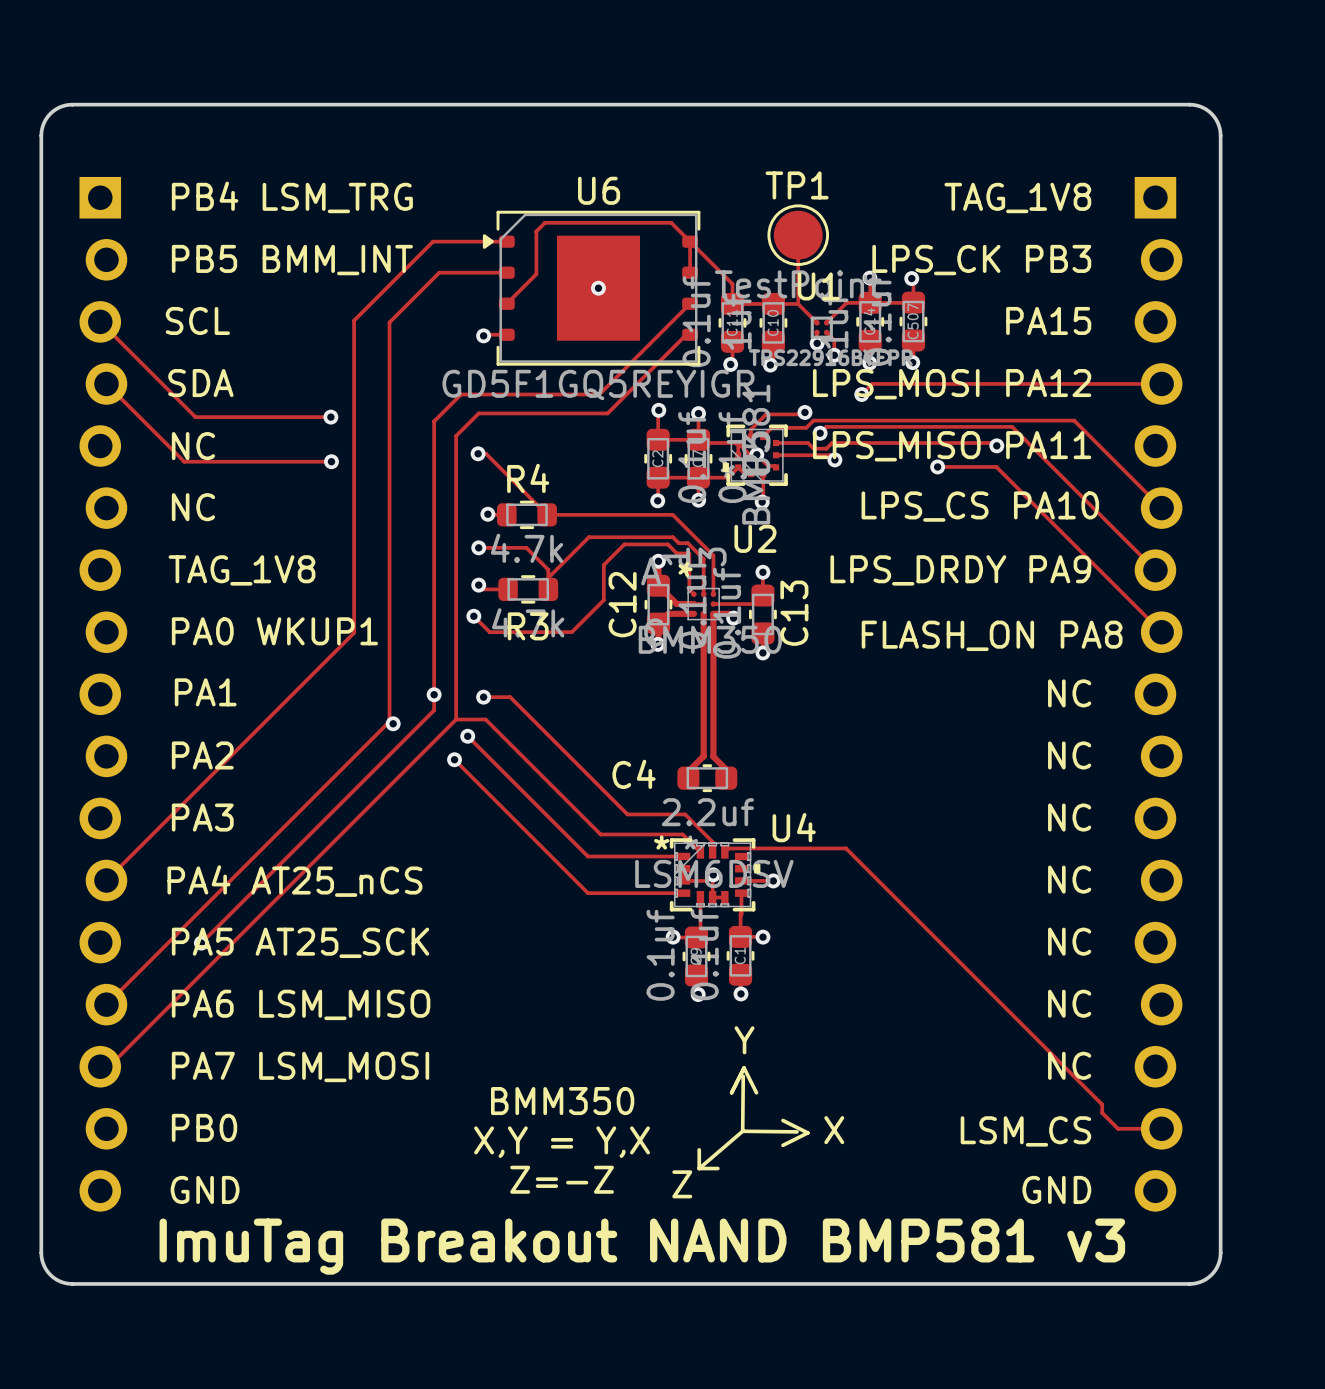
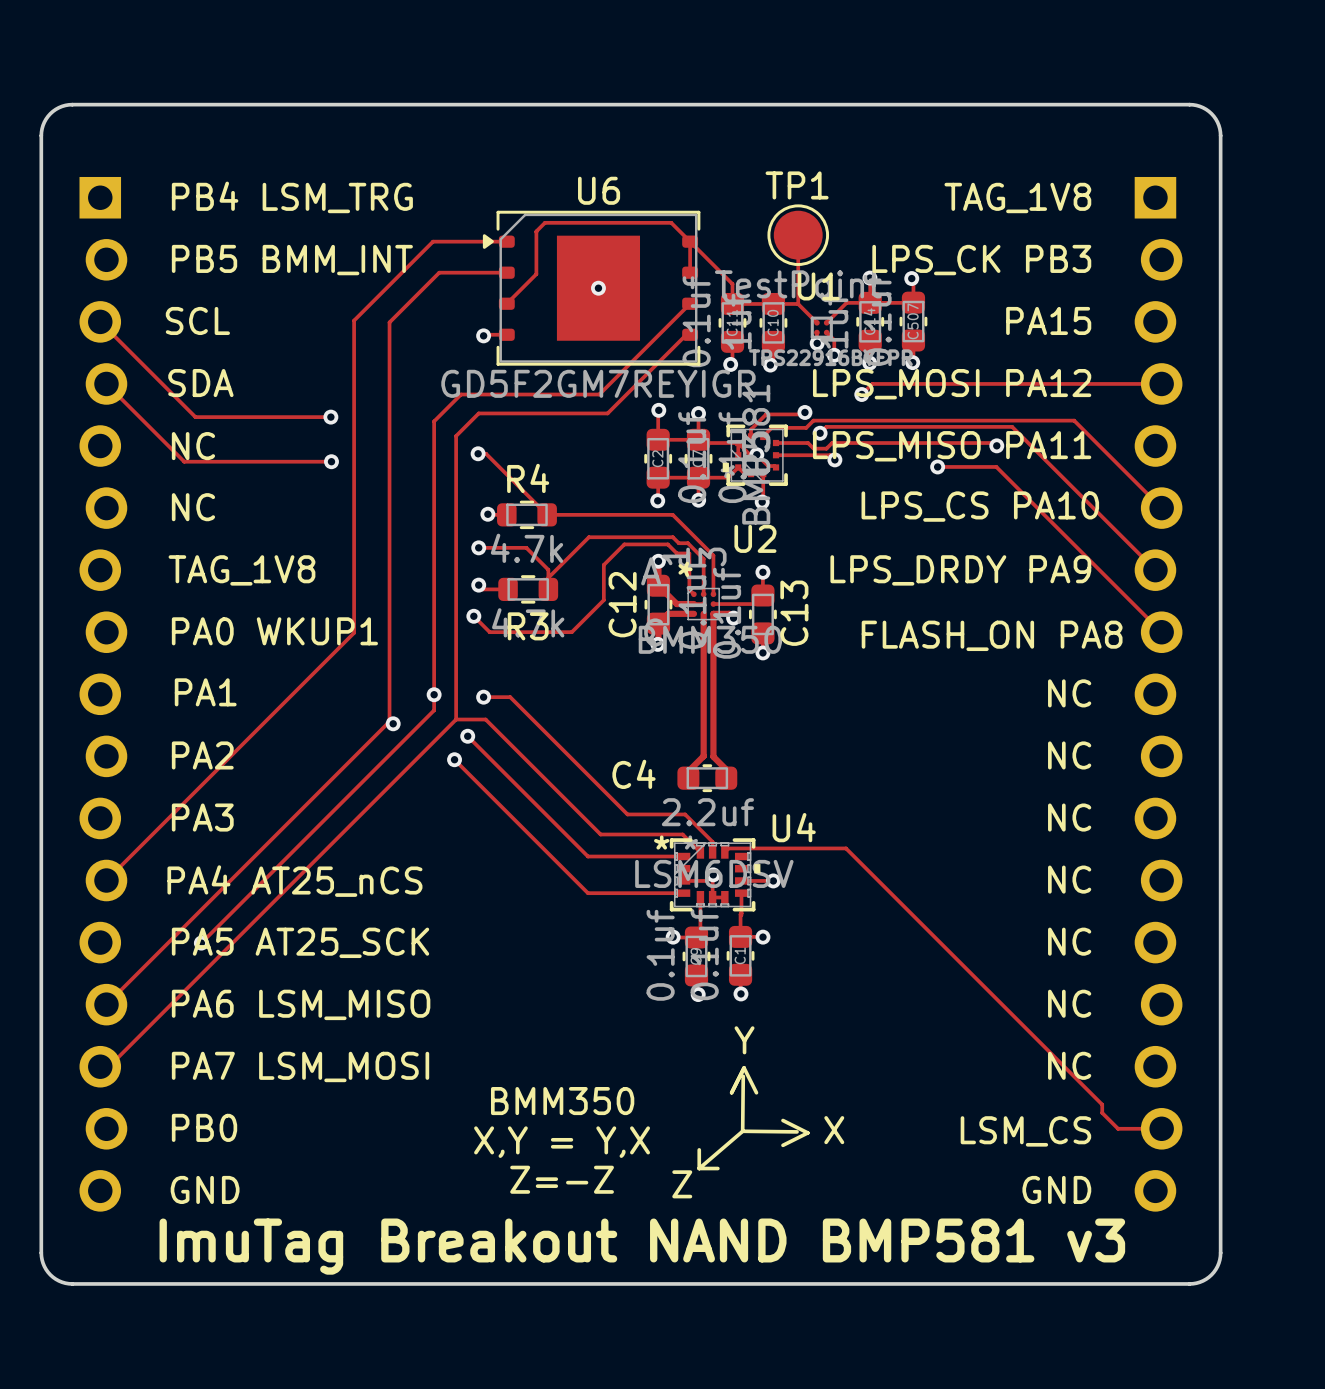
U6 value: GD5F1GQ5REYIGR (598, 384) -> GD5F2GM7REYIGR (598, 383)

